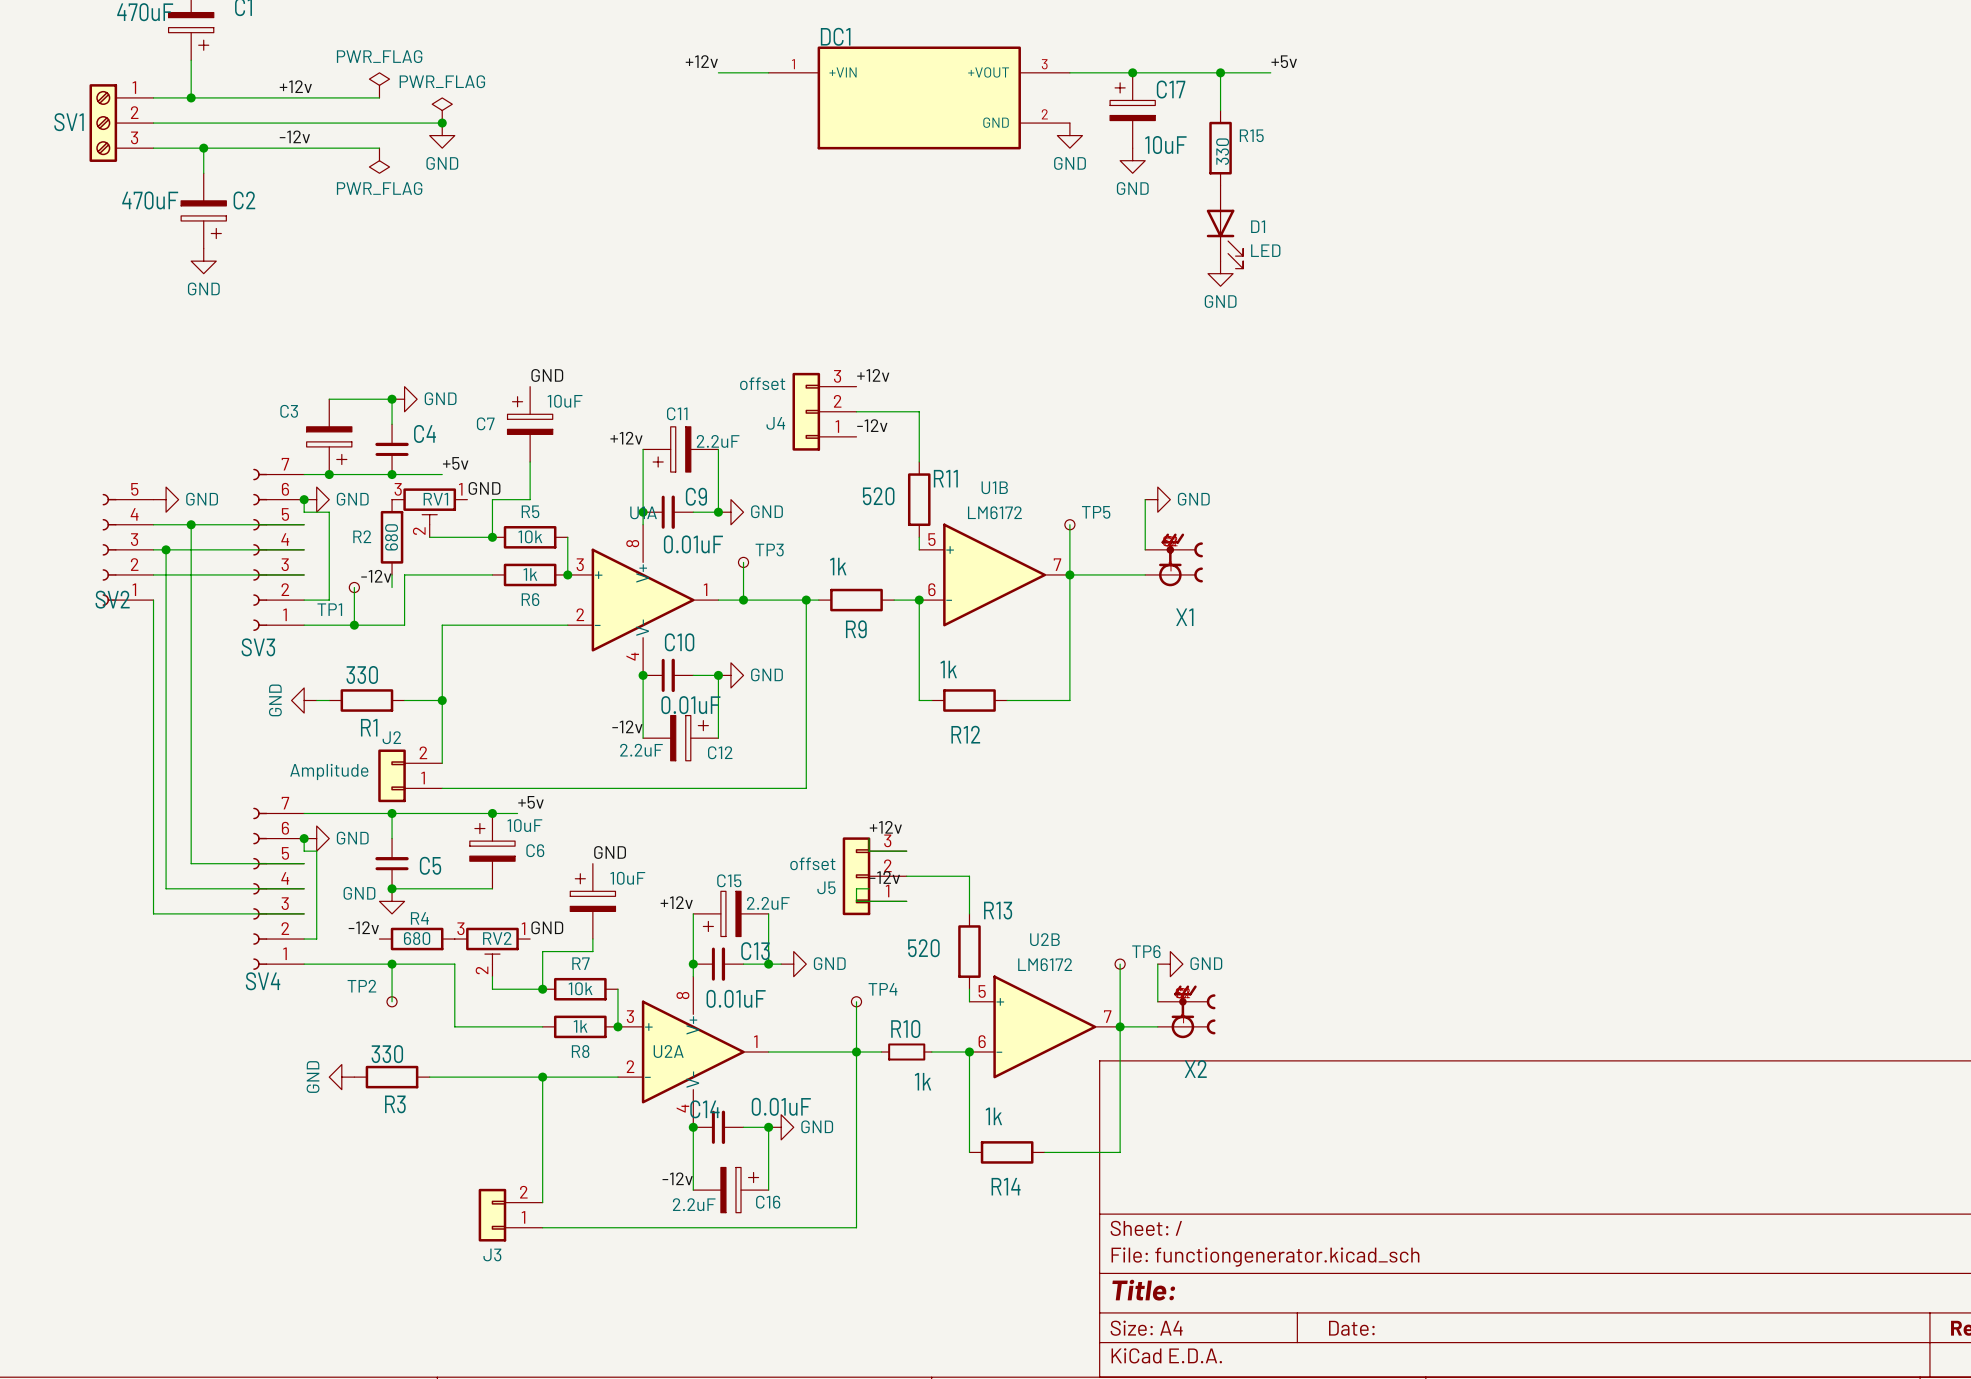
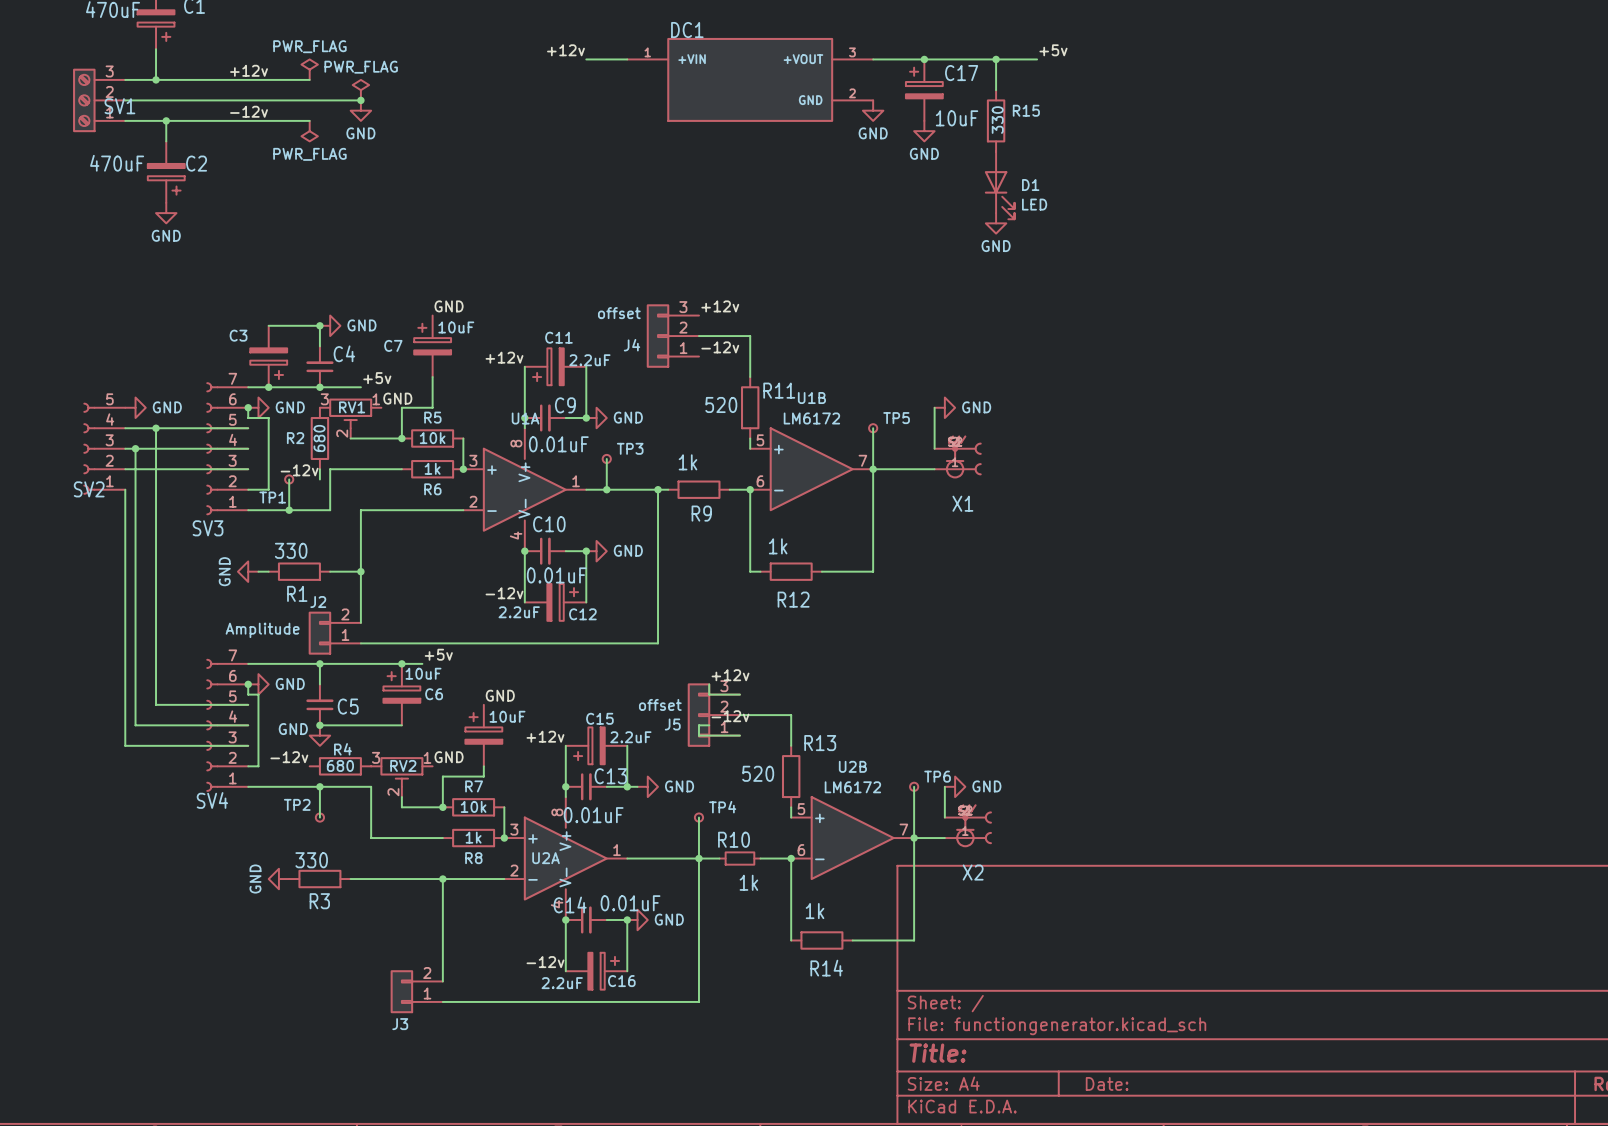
SV1 name position: SV1 (69, 122) -> SV1 (119, 106)
SV1 flip: as is (103, 123) -> up-down (84, 100)

